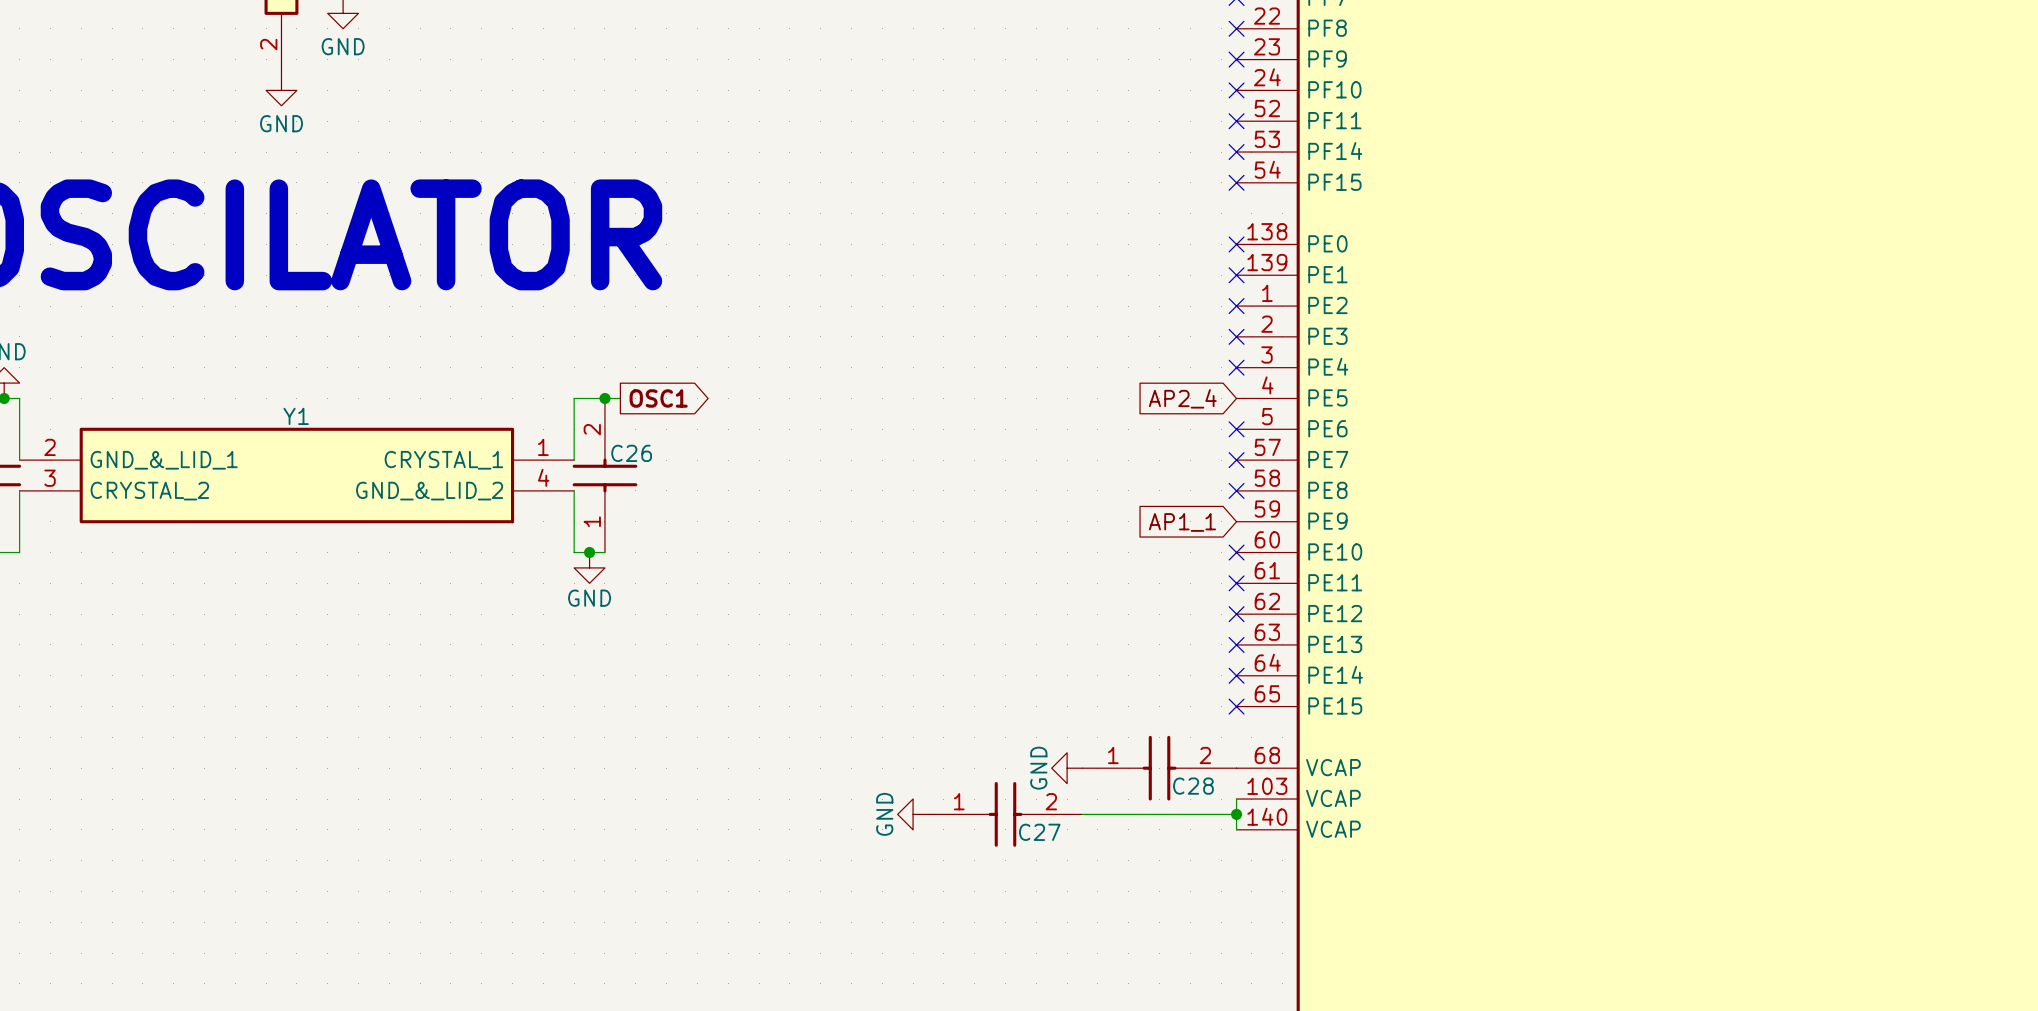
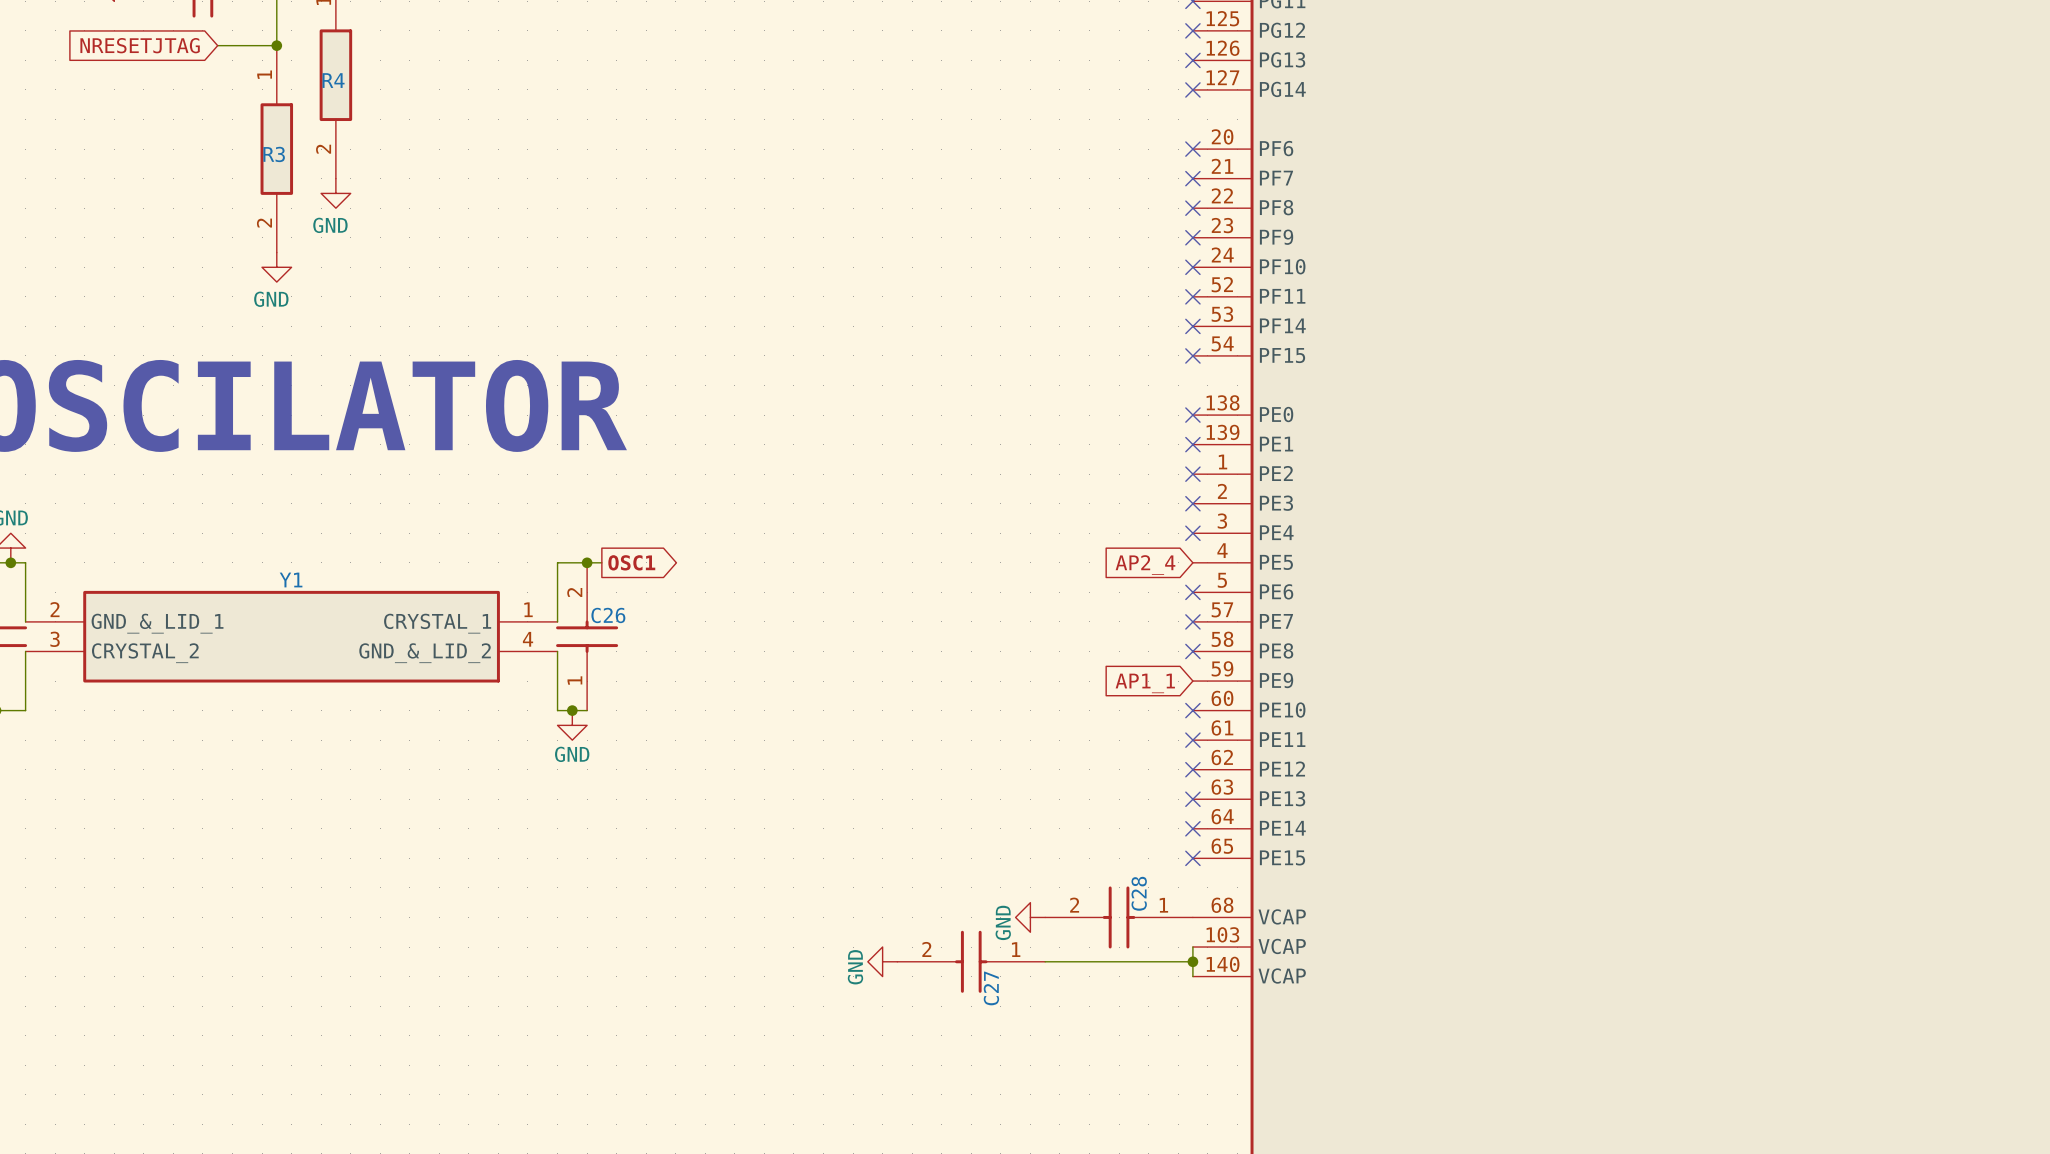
C28 rotation: 0° (1159, 768) -> 180° (1119, 917)
C28 name position: C28 (1193, 786) -> C28 (1139, 893)
C27 rotation: 0° (1005, 814) -> 180° (971, 961)

